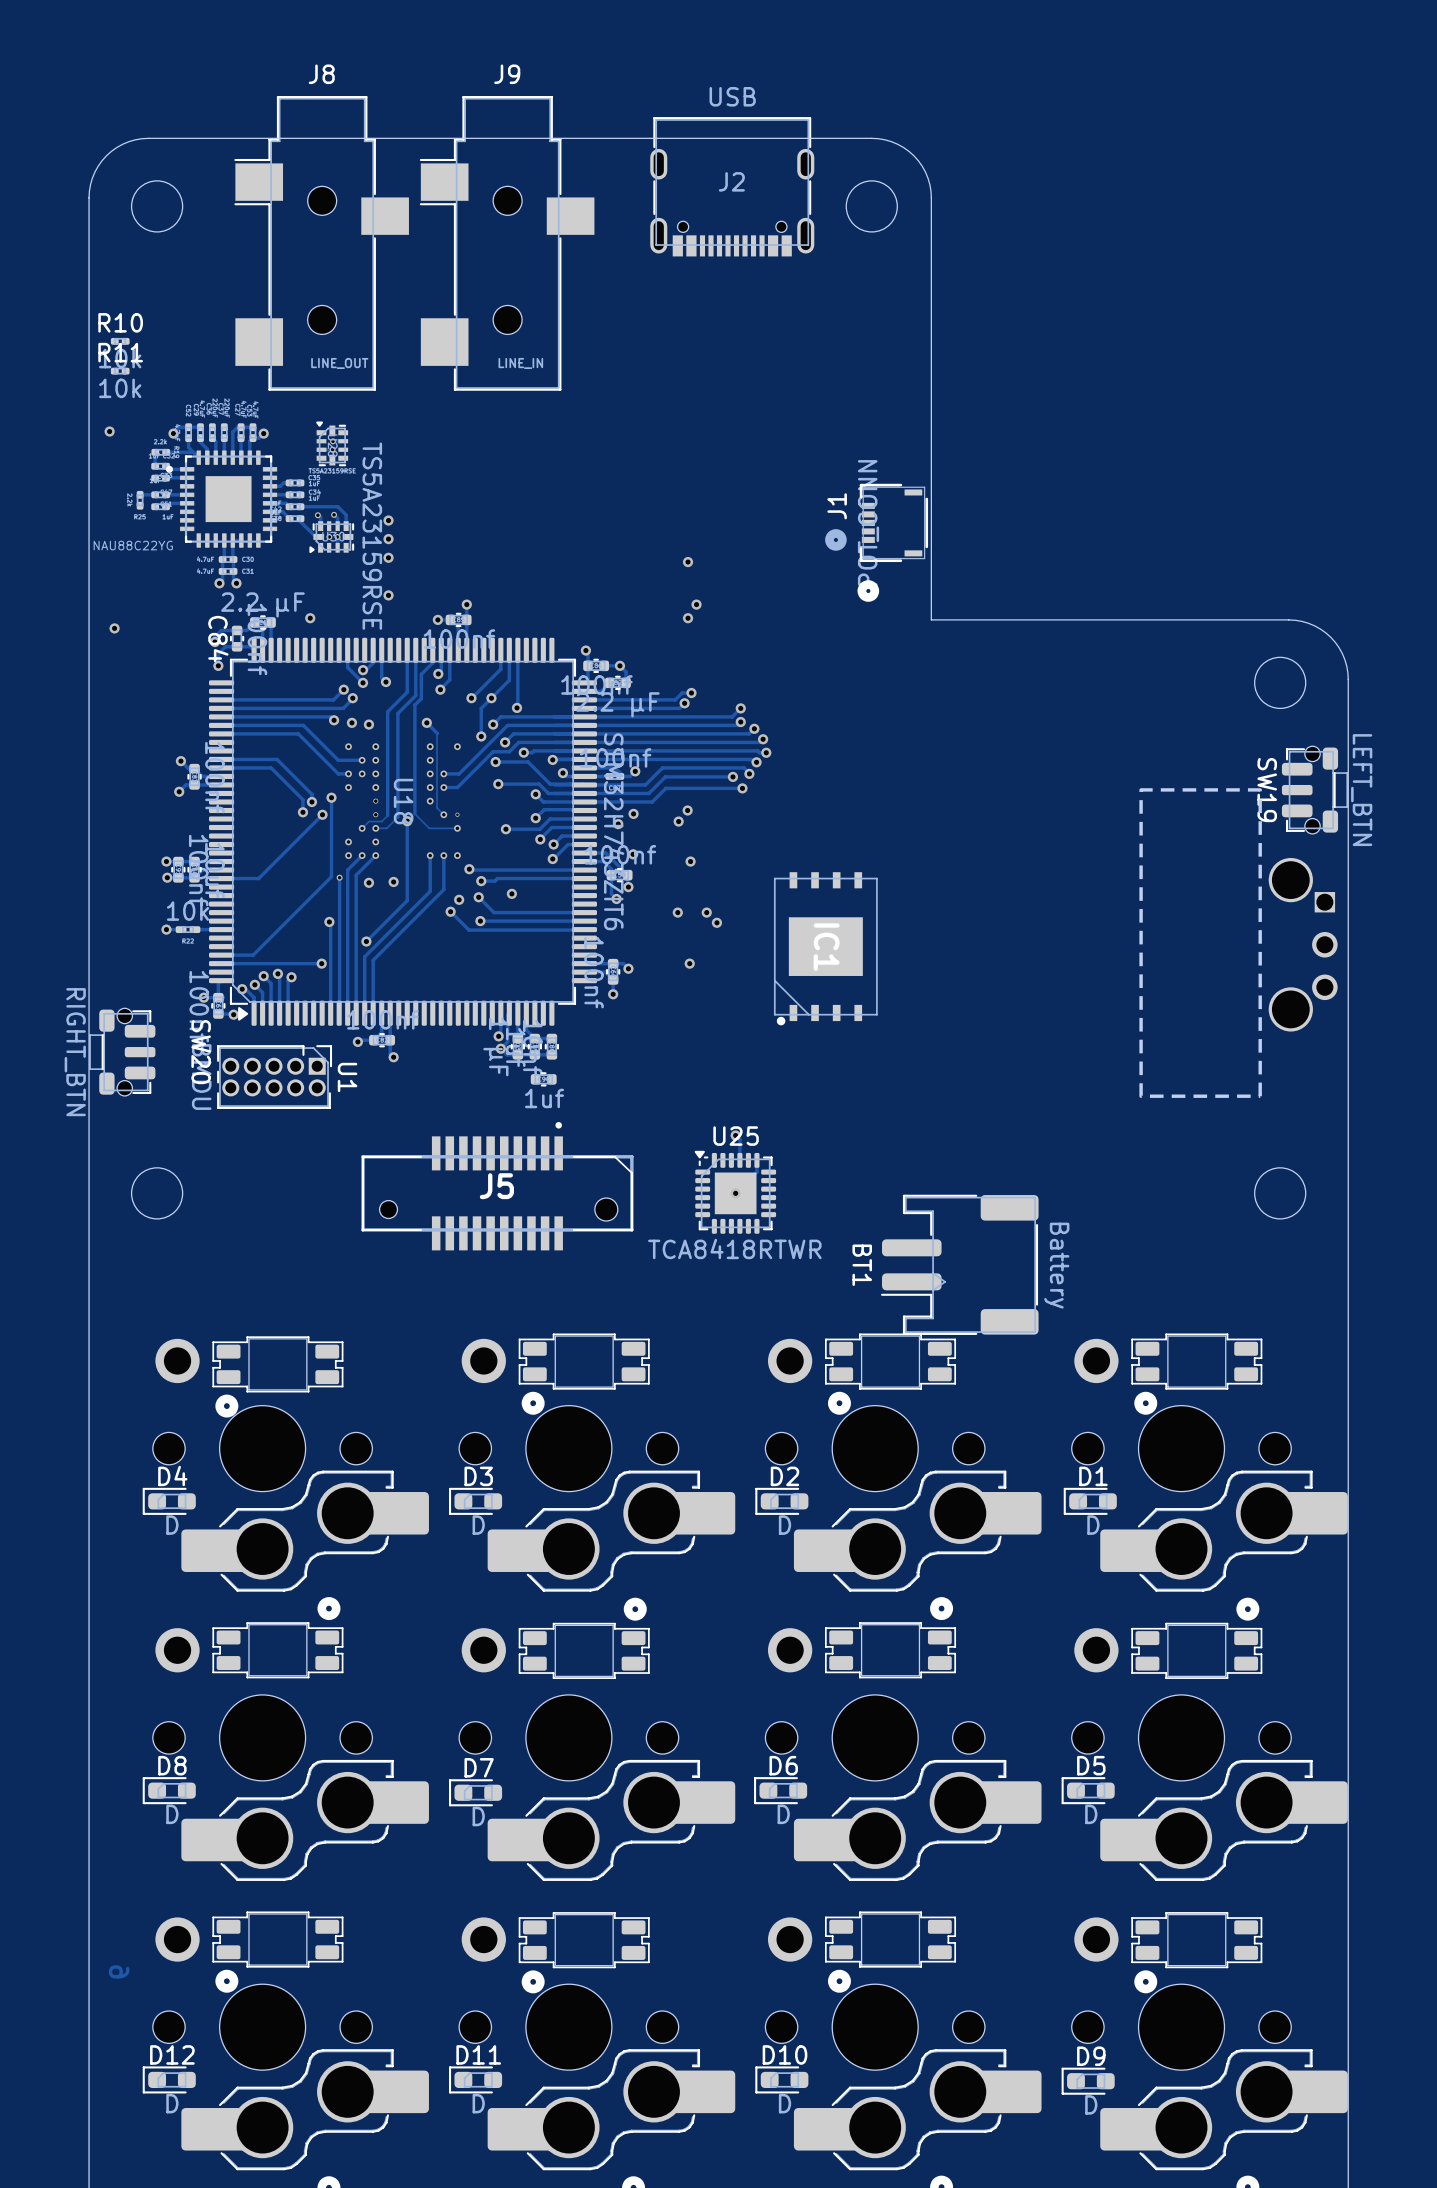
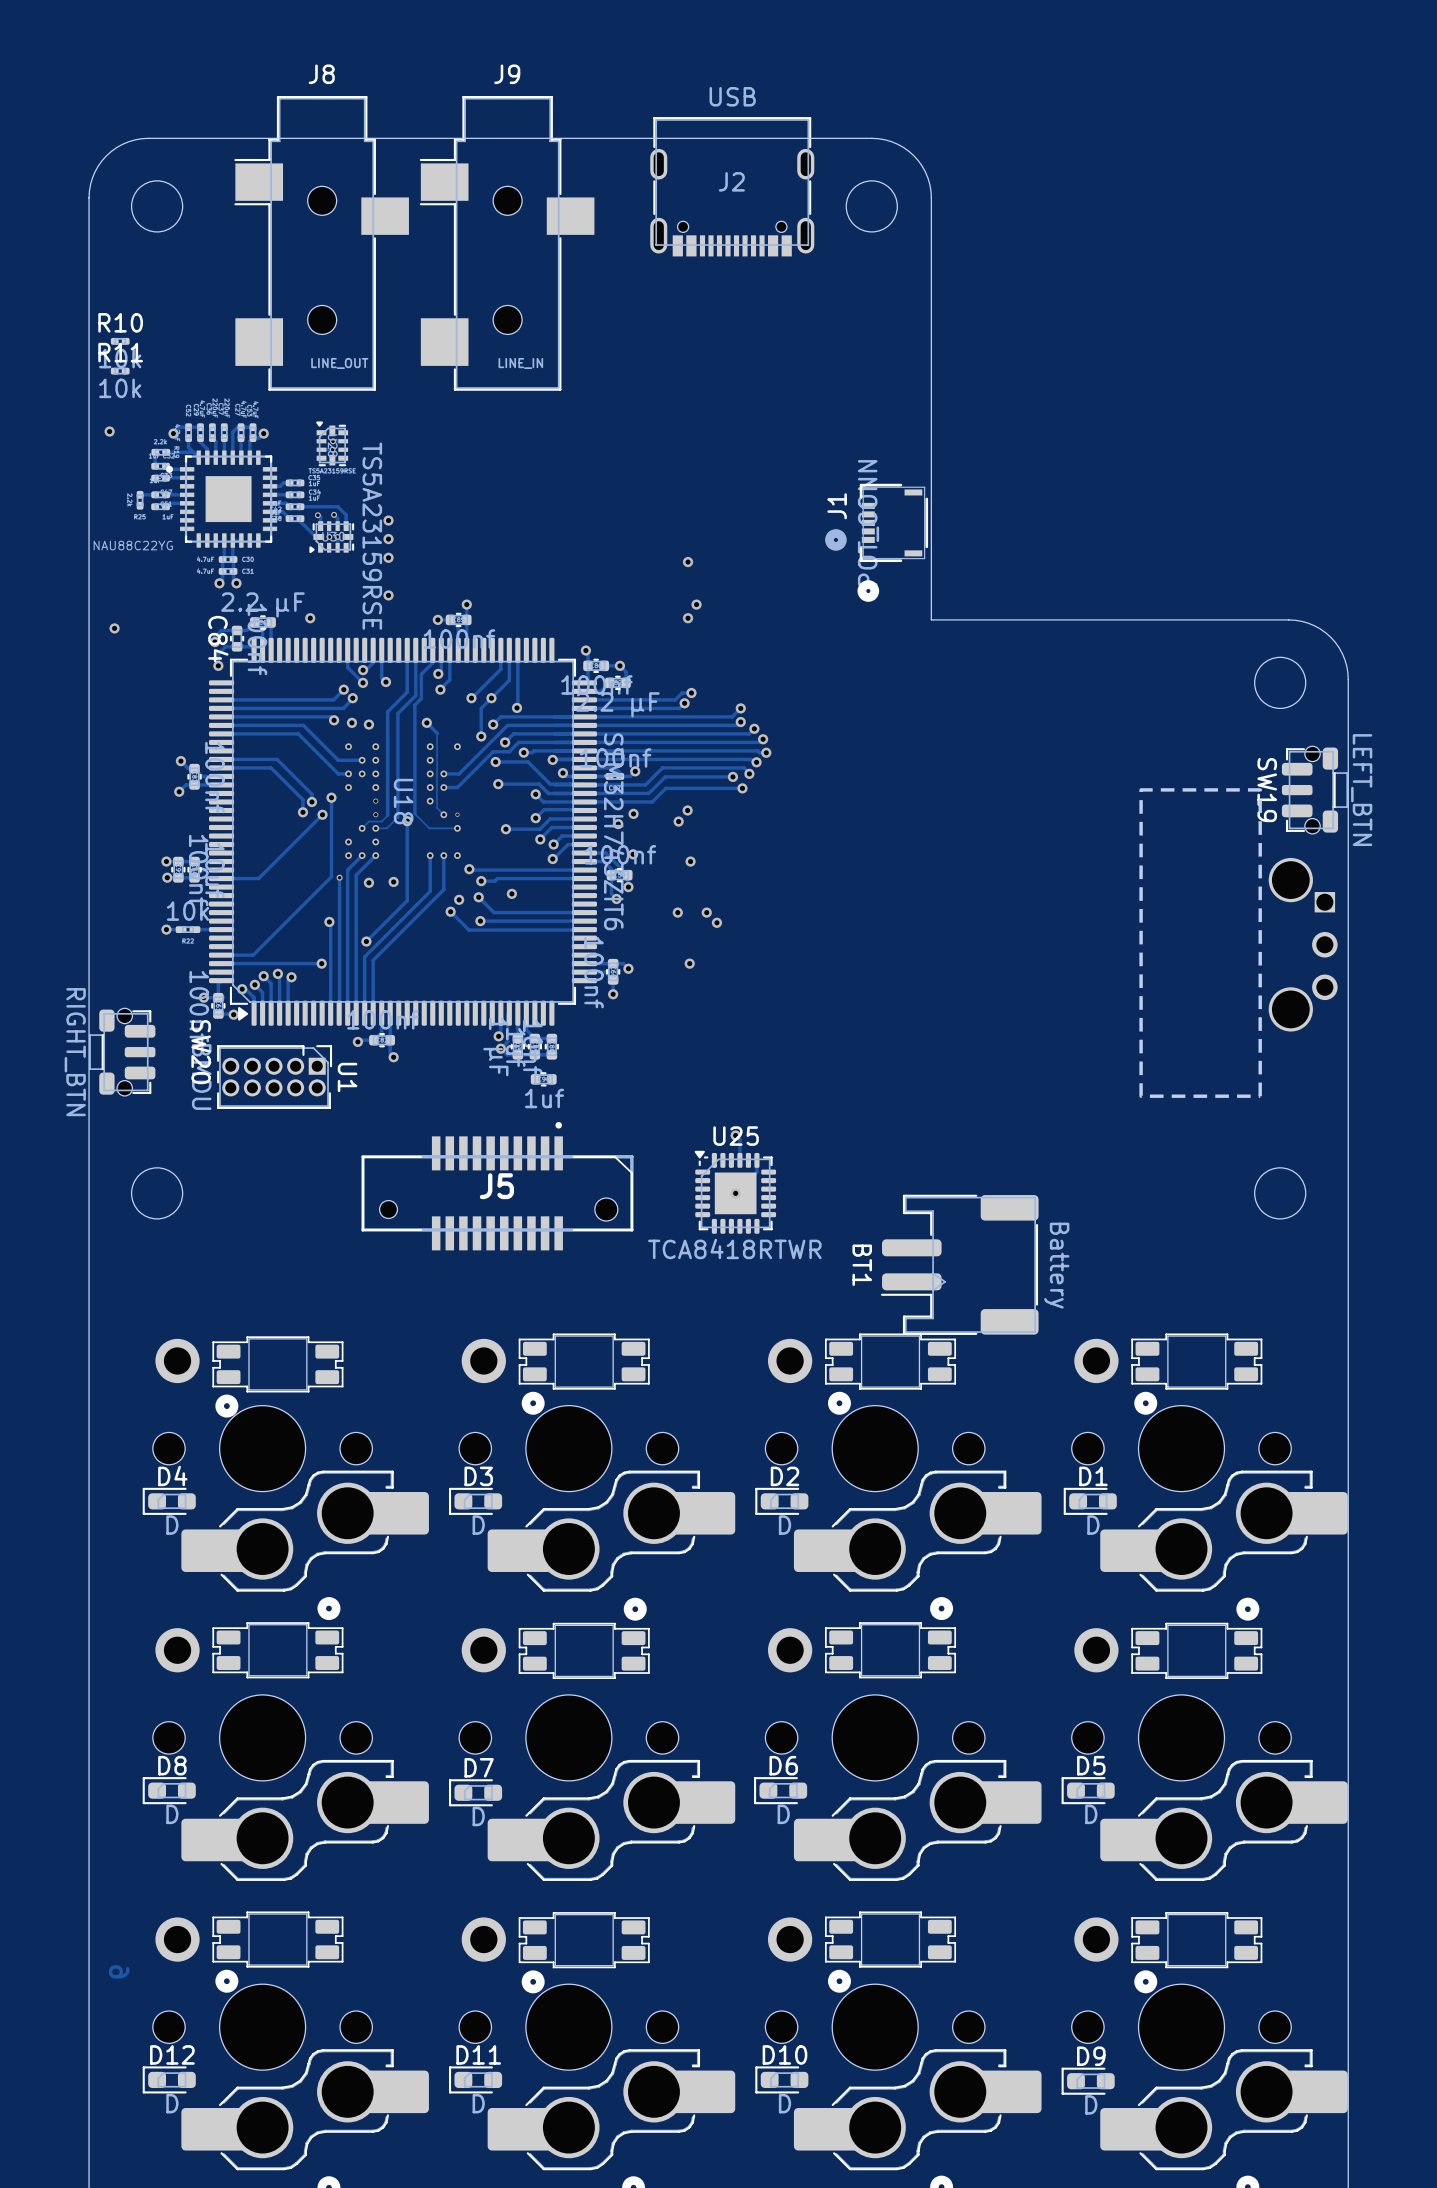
part: (825, 948) -> none

